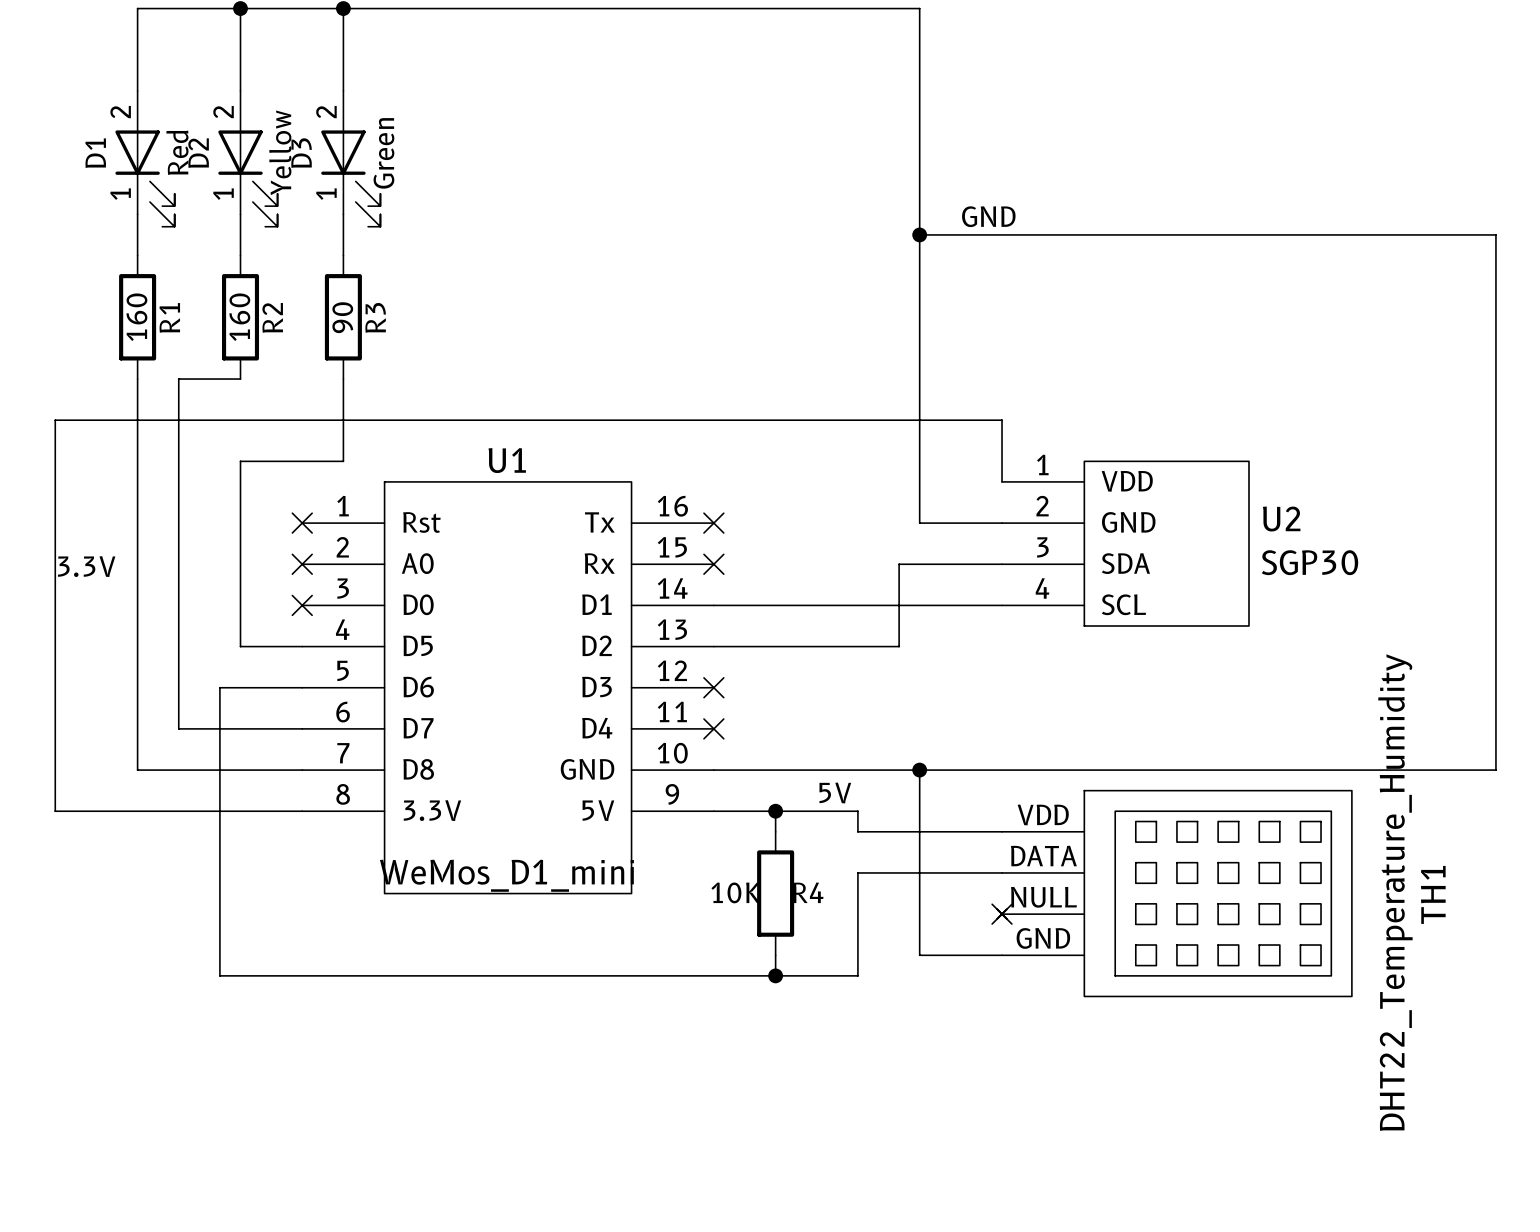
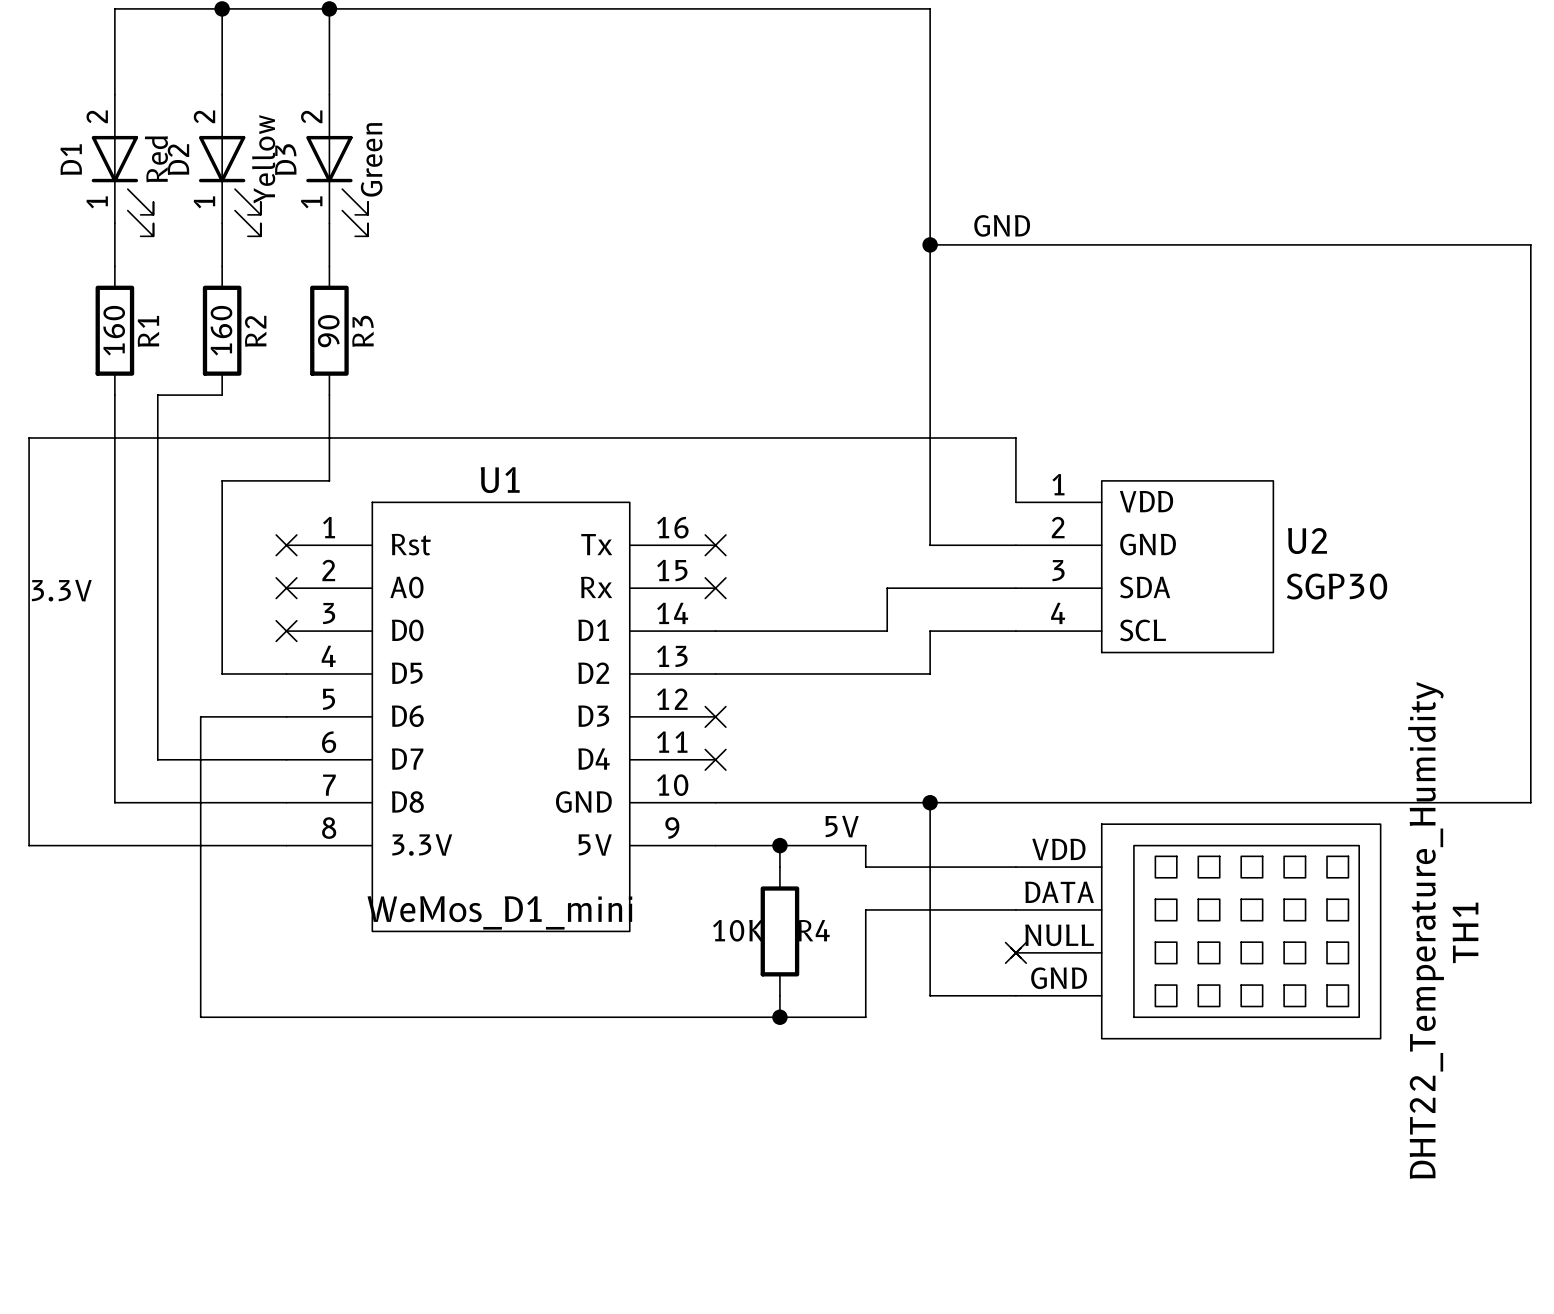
wire: (899, 564) (899, 646) -> (908, 588) (887, 588) (887, 631)
wire: (878, 605) (919, 605) -> (908, 673) (930, 673) (930, 631)

